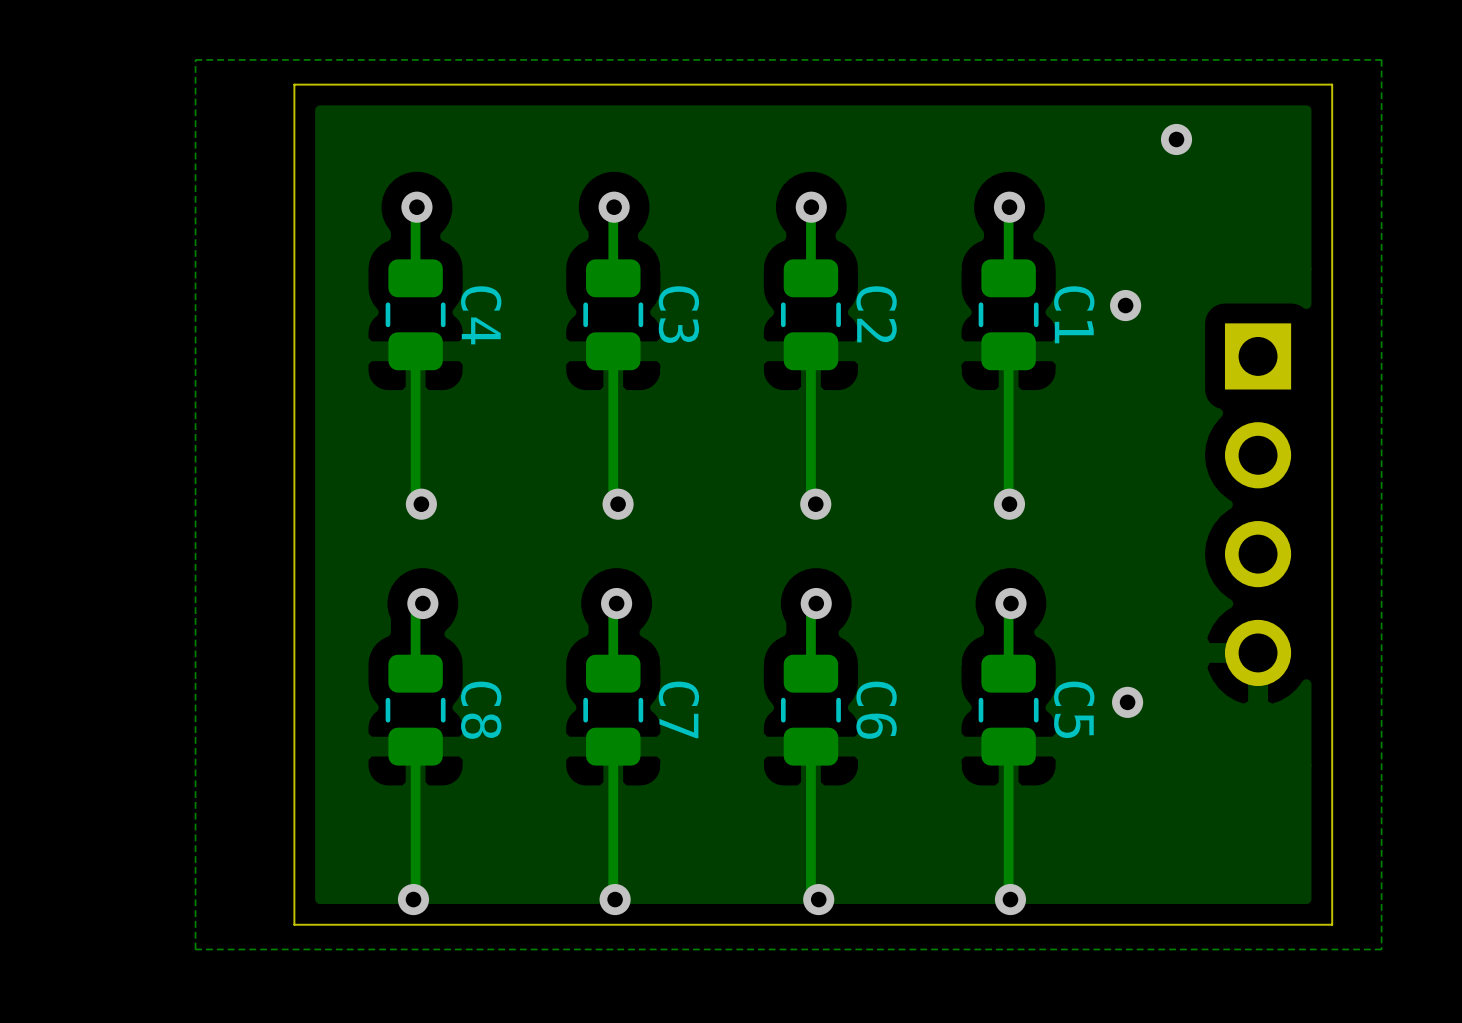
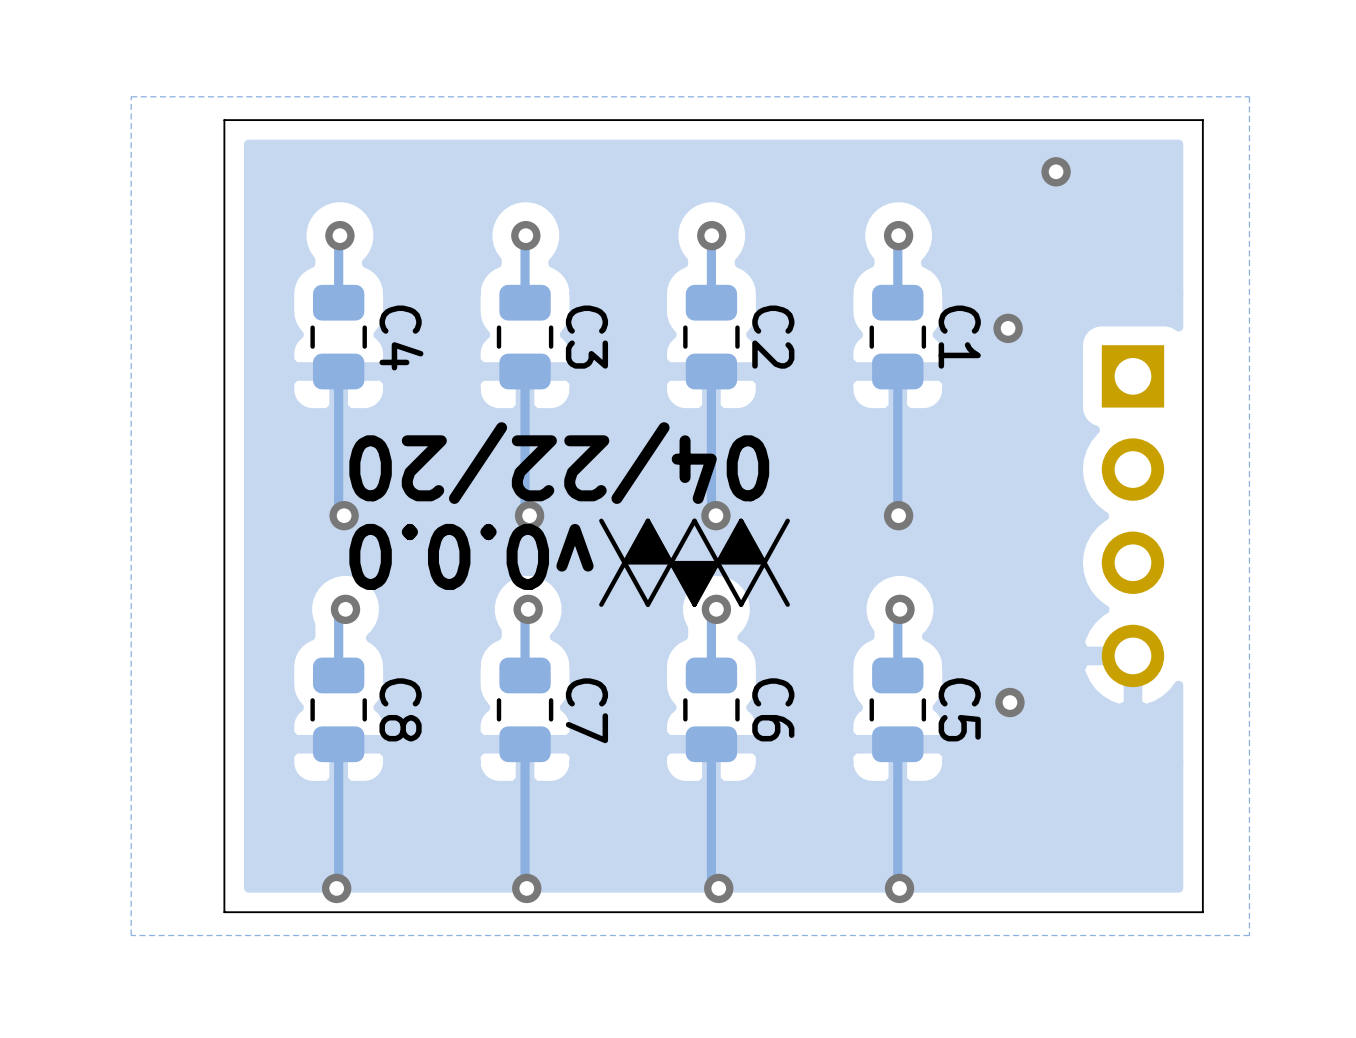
text: none -> 04/22/20 (559, 463)
drawing: none -> [599, 518, 790, 607]
text: none -> v0.0.0 (471, 556)

